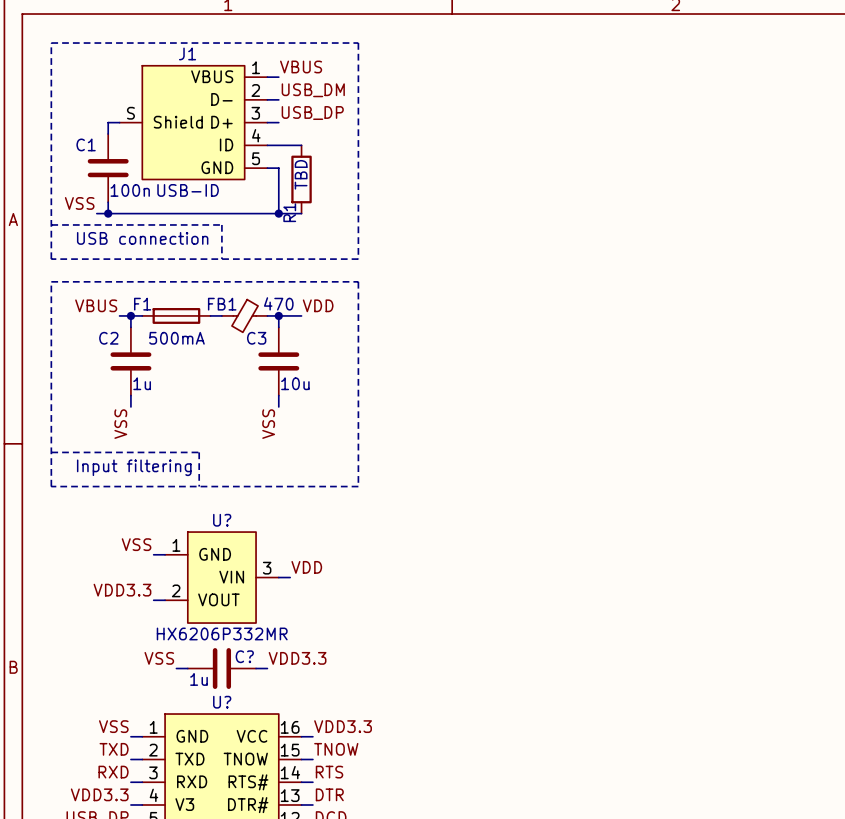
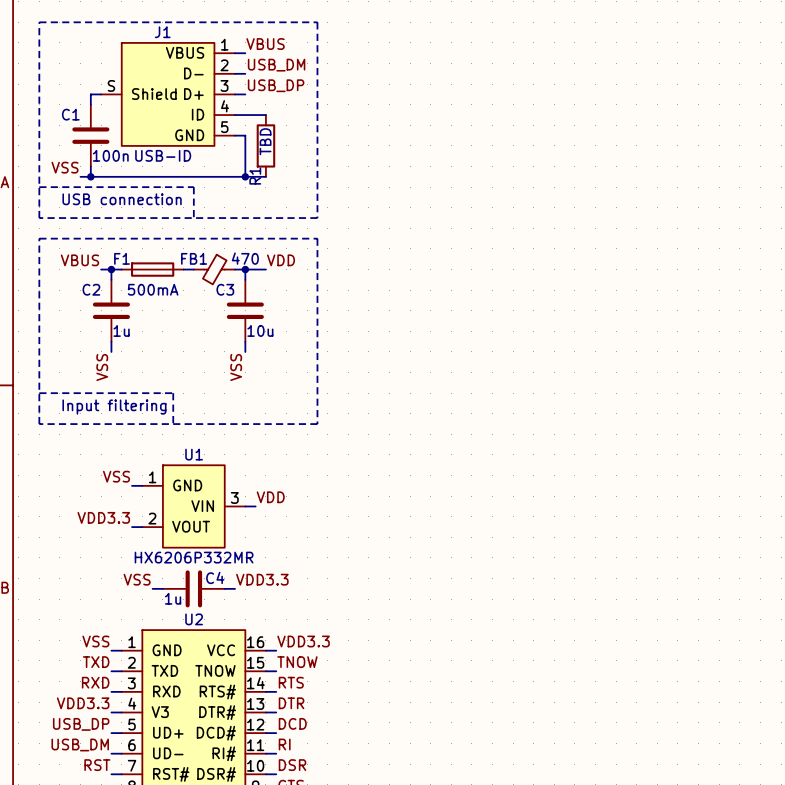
U? name: U? (222, 520) -> U1 (194, 454)
C? name: C? (244, 656) -> C4 (215, 577)
U? name: U? (222, 702) -> U2 (194, 619)

